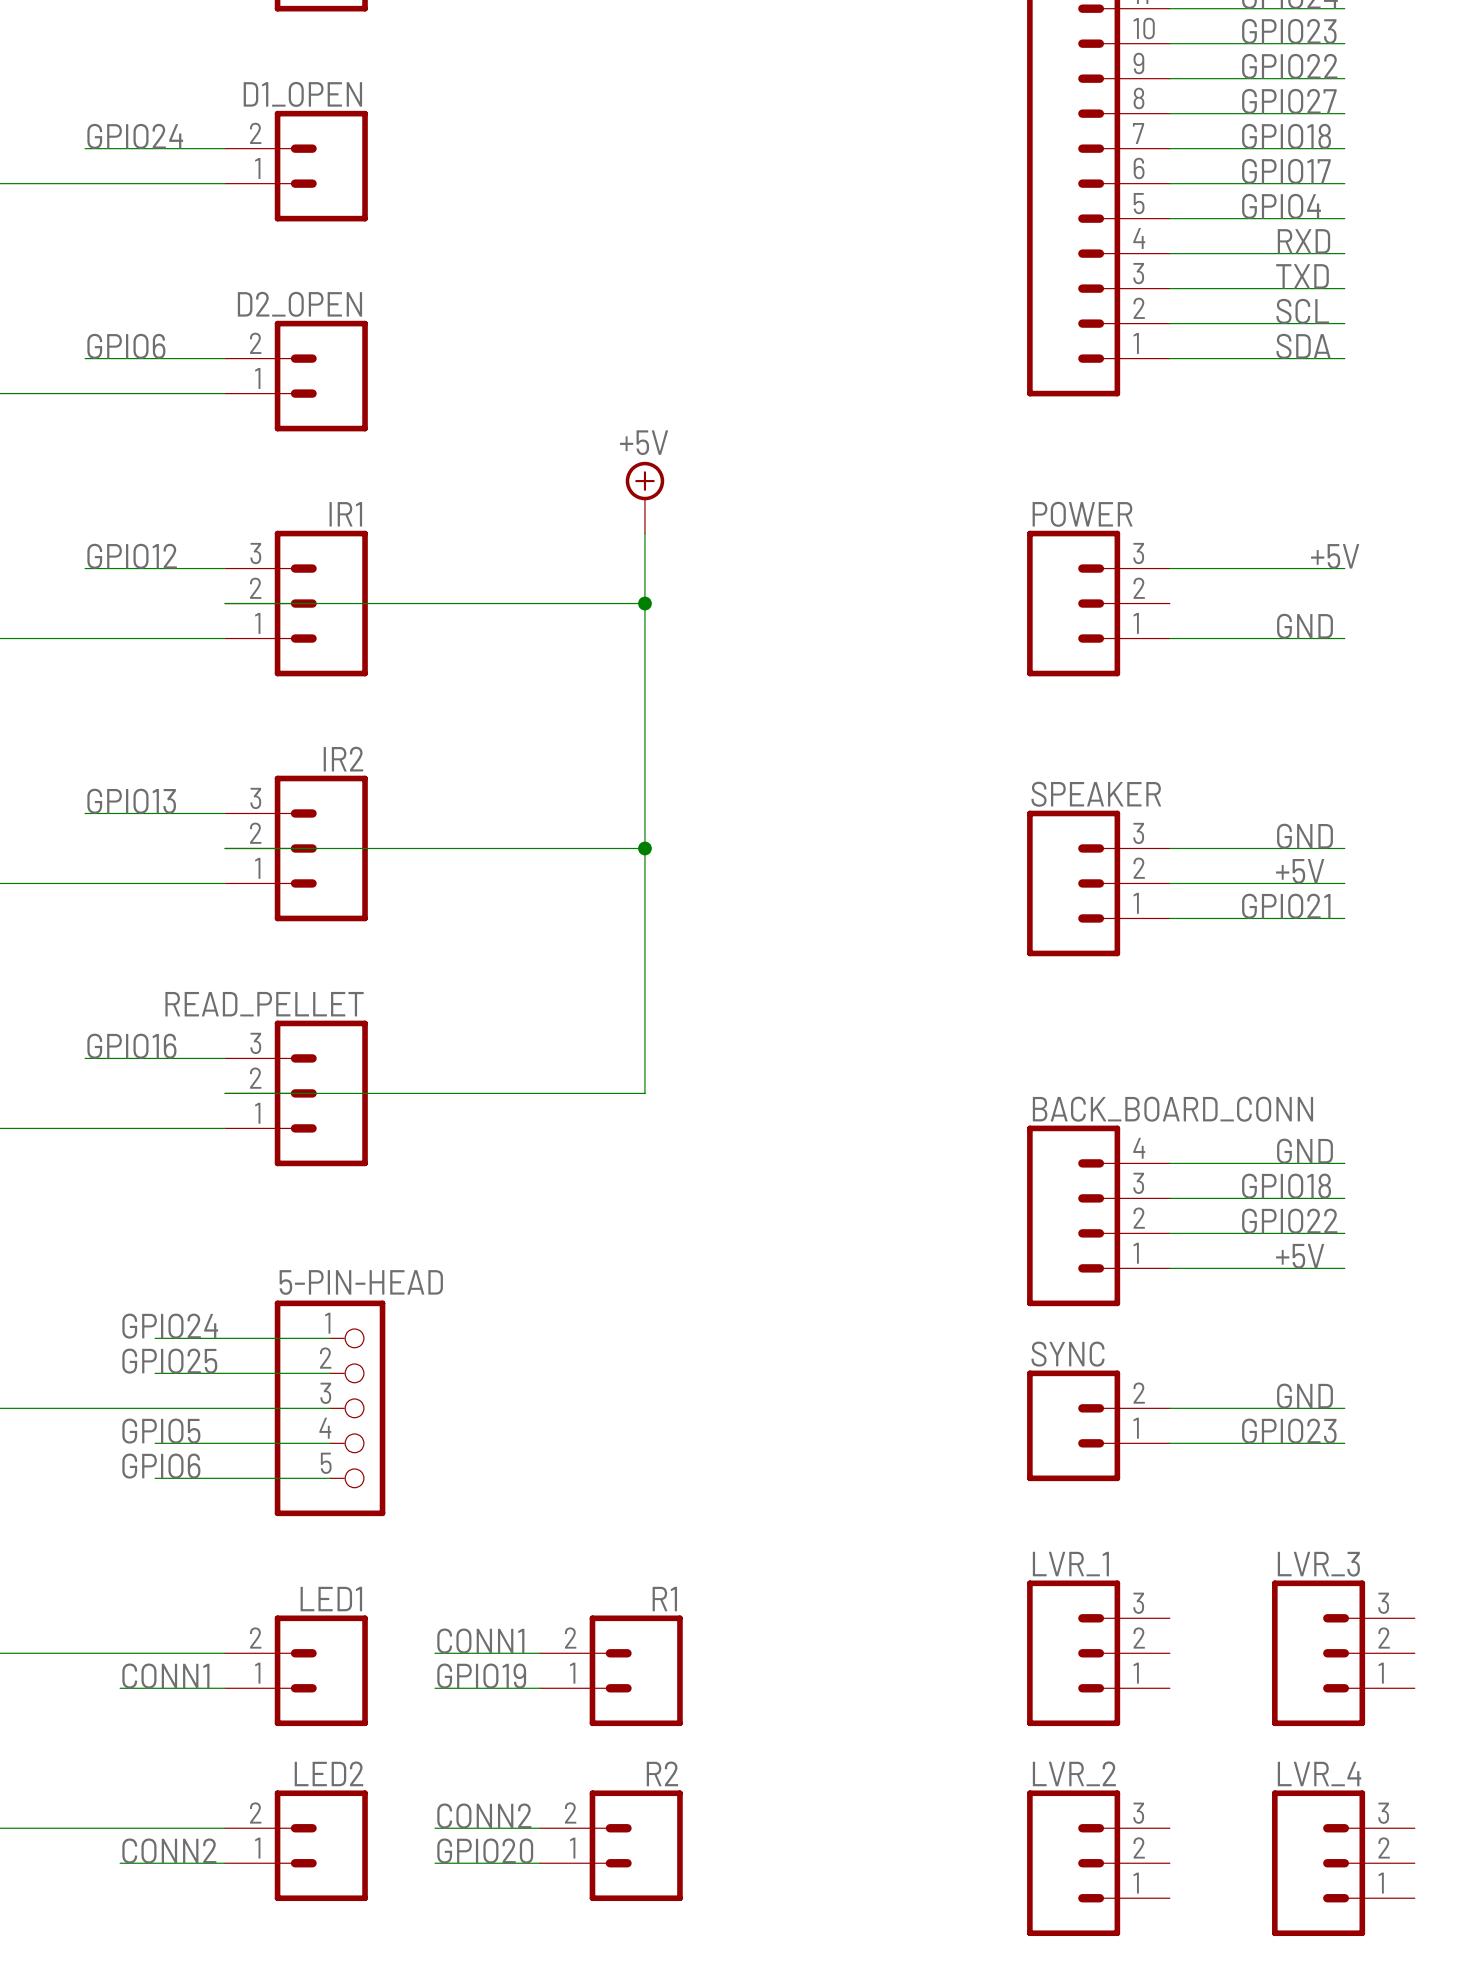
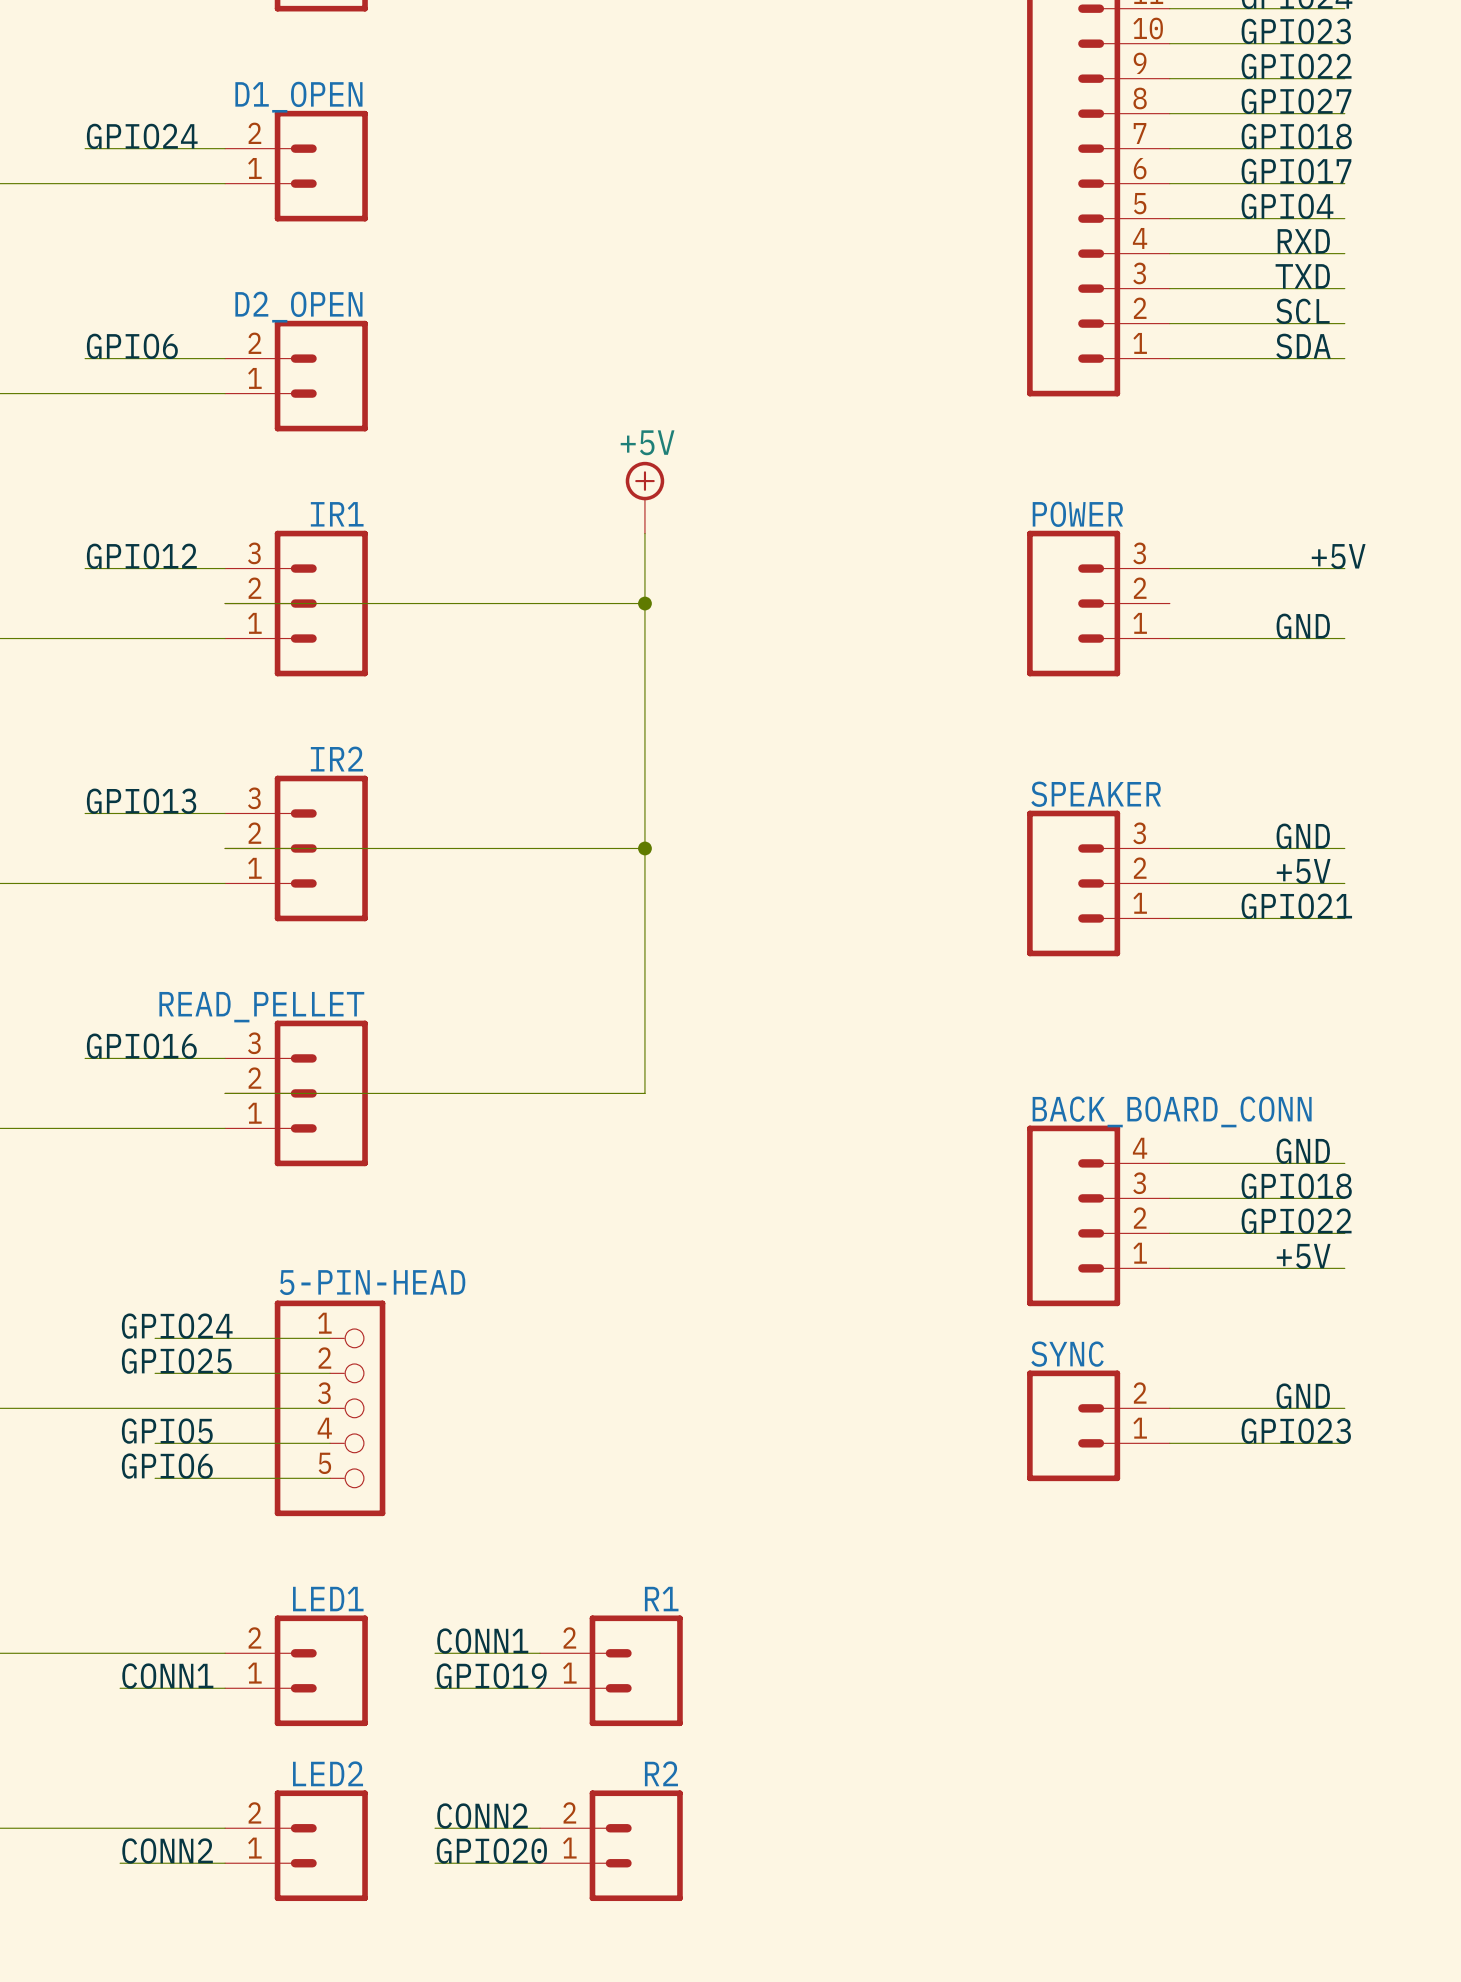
LVR_1: (1098, 1653) -> none
LVR_3: (1343, 1653) -> none
LVR_2: (1098, 1863) -> none
LVR_4: (1343, 1863) -> none

